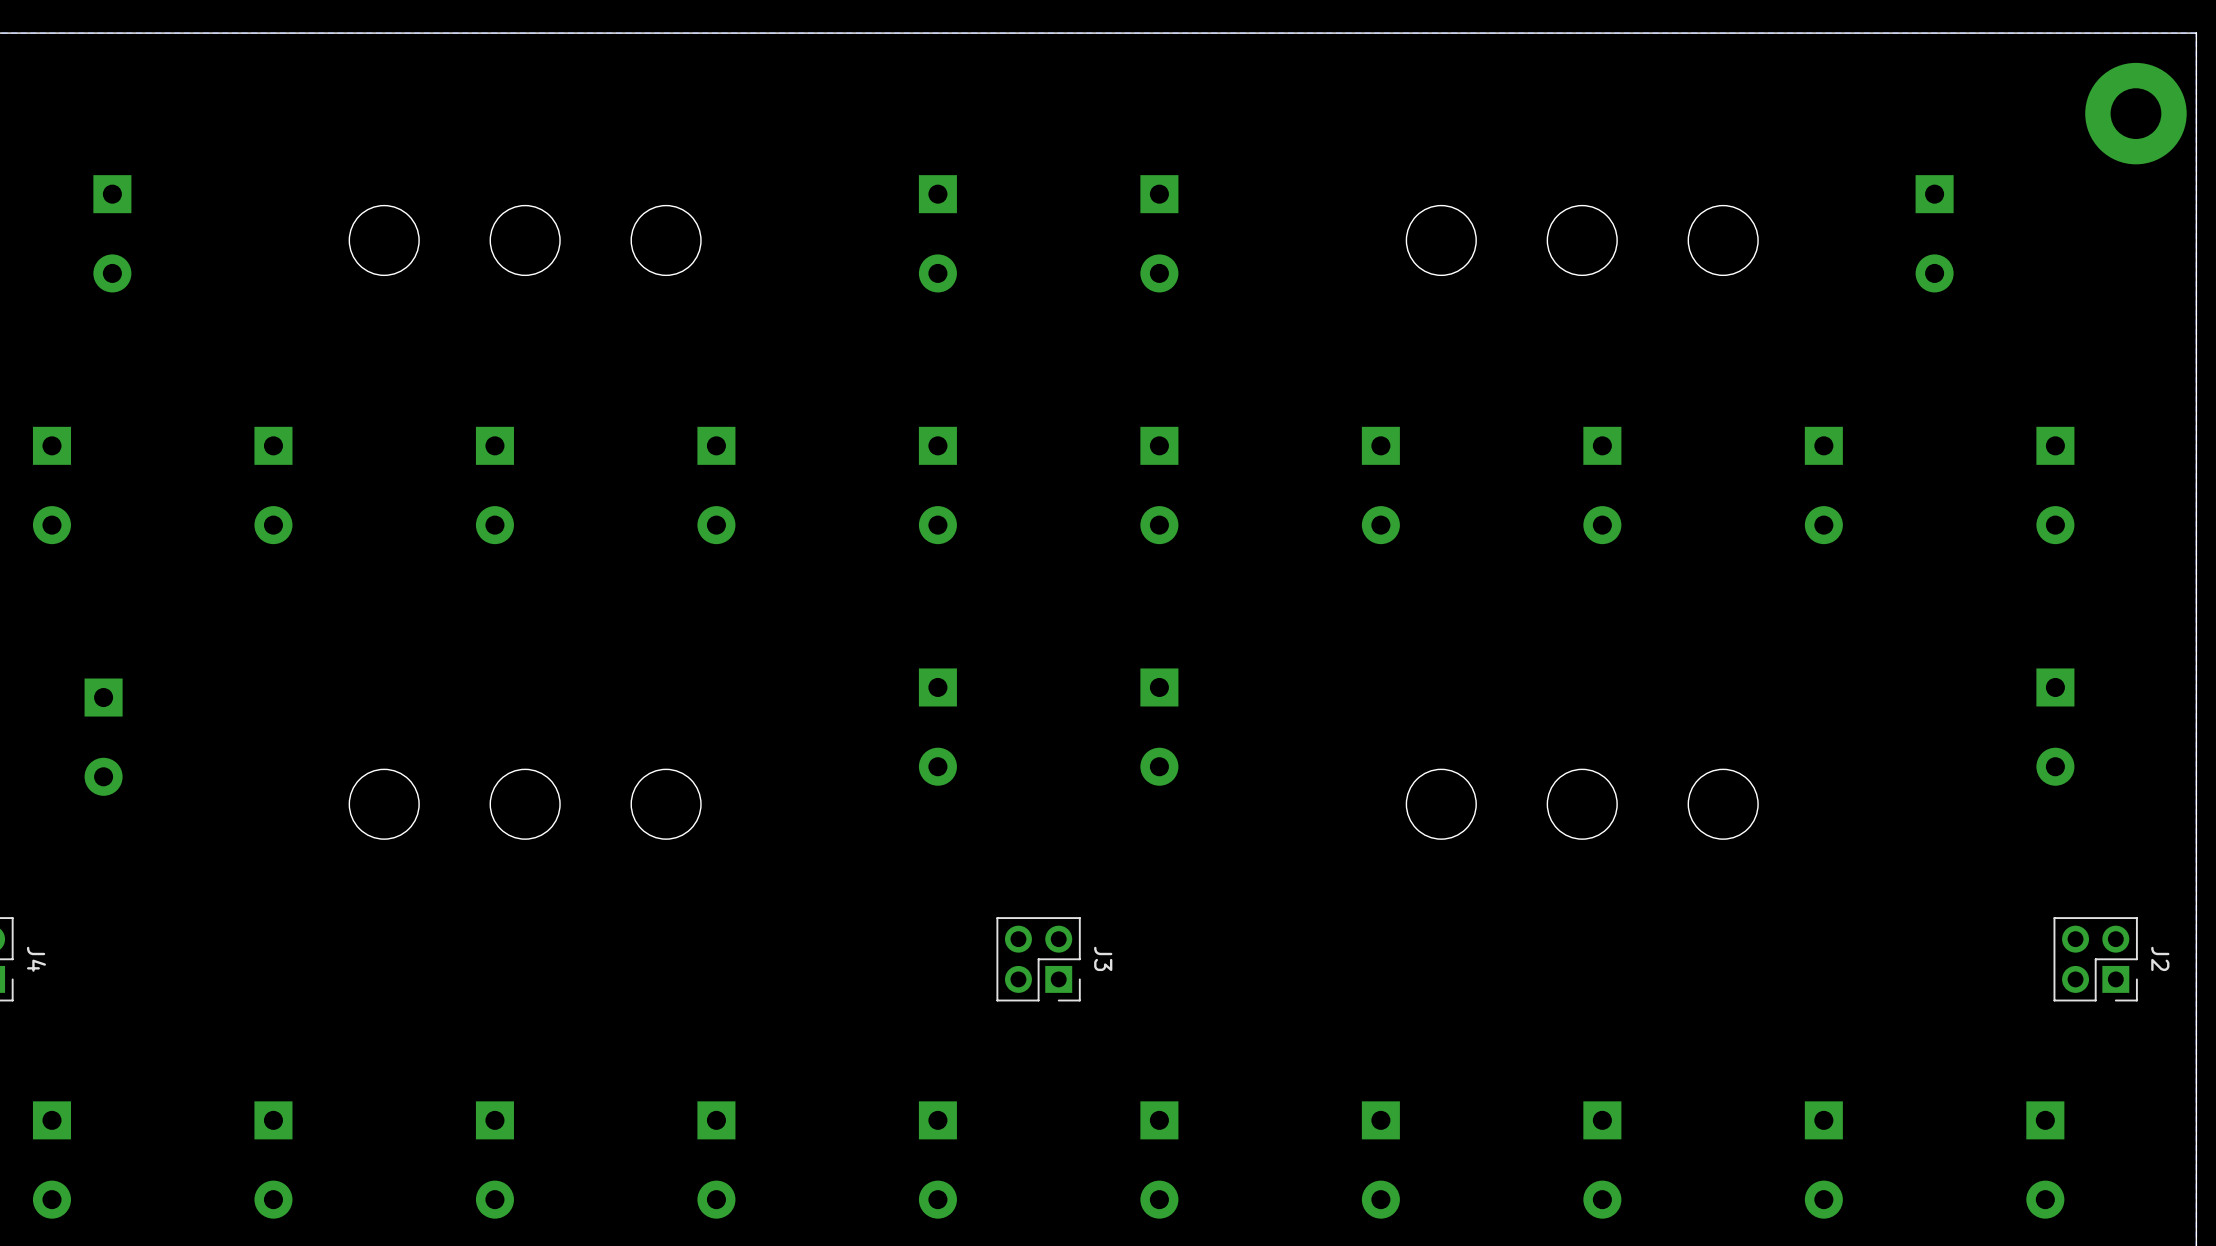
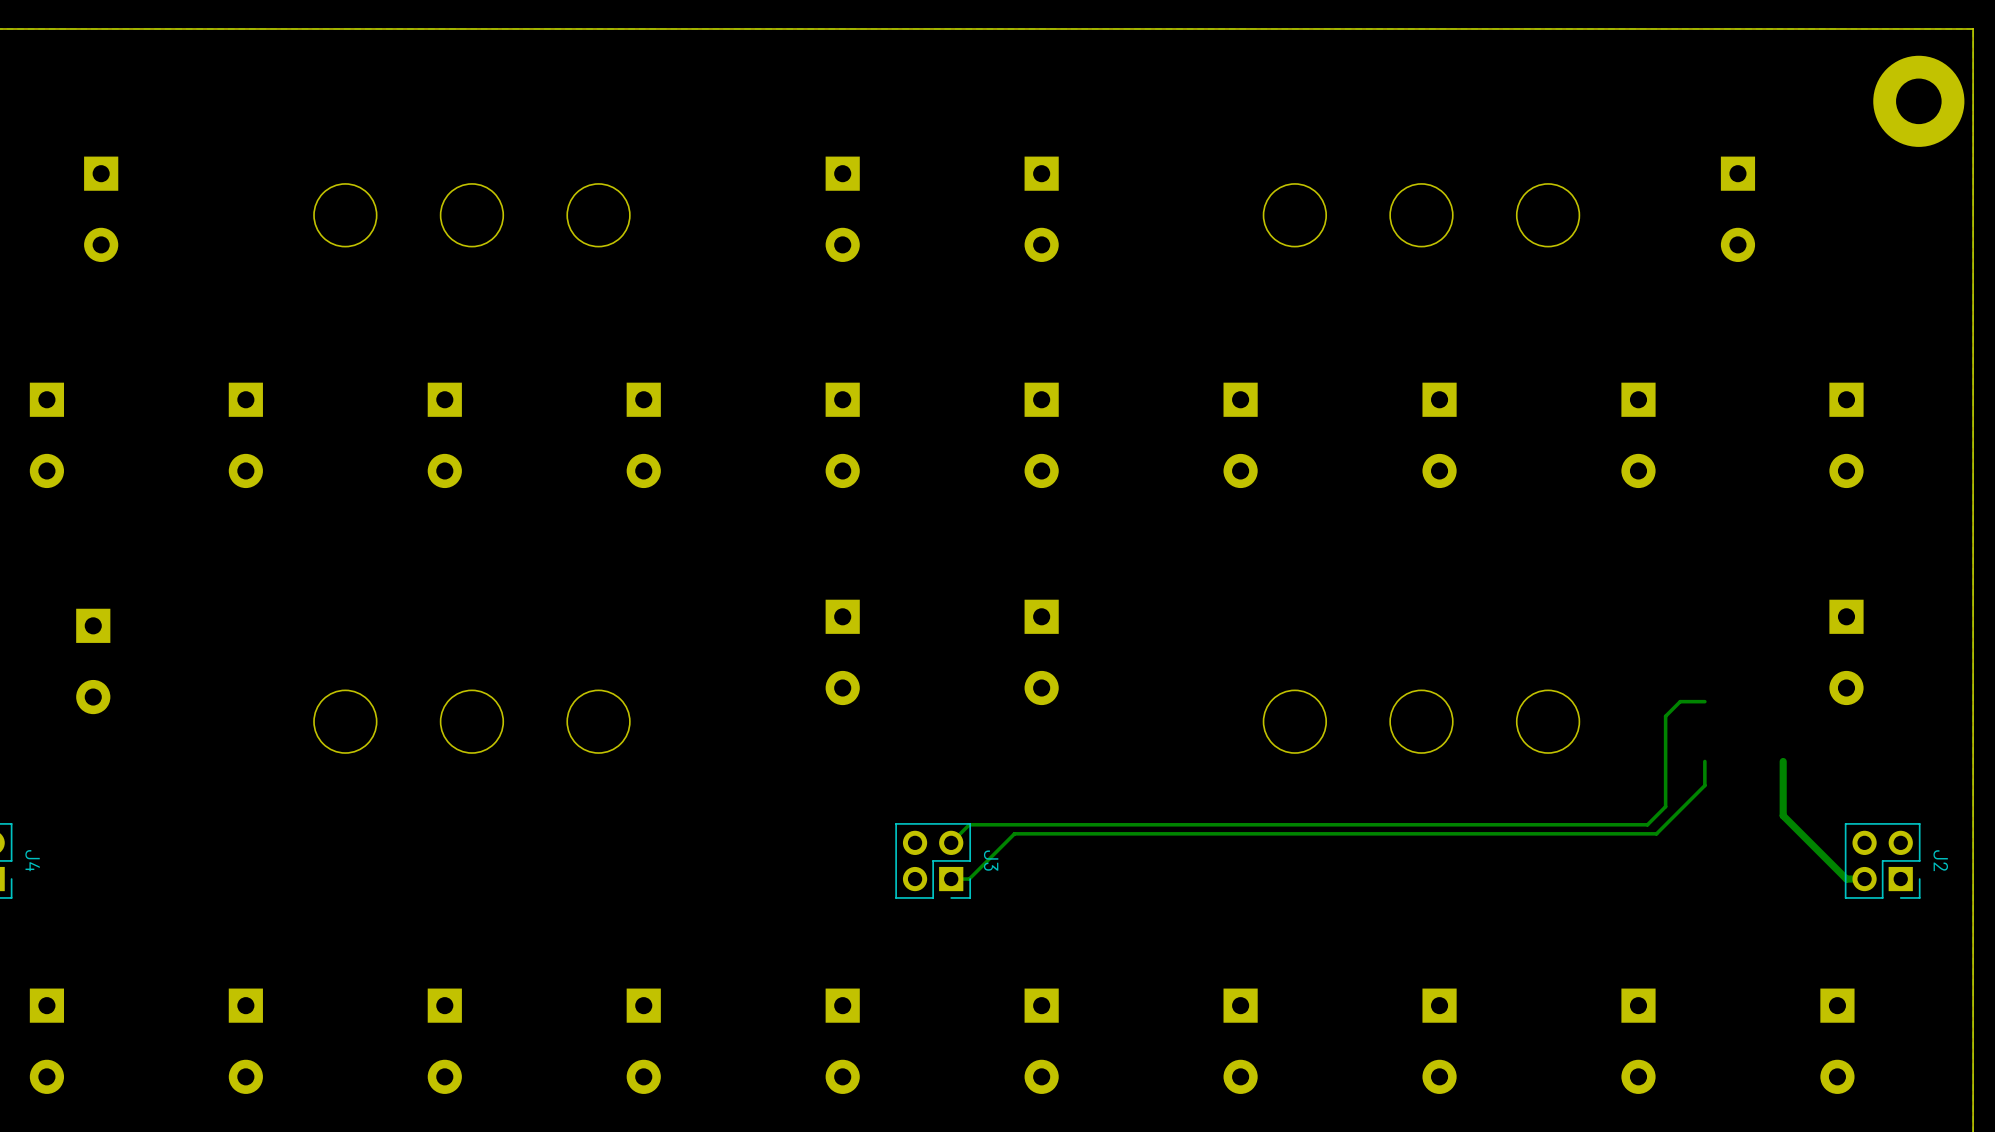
track: none -> (1704, 701) (1680, 701) (1665, 716) (1665, 806) (1647, 824) (969, 824) (951, 842)
track: none -> (1704, 761) (1704, 785) (1656, 833) (1014, 833) (969, 879) (951, 879)
track: none -> (1783, 761) (1783, 815) (1846, 879) (1864, 879)

